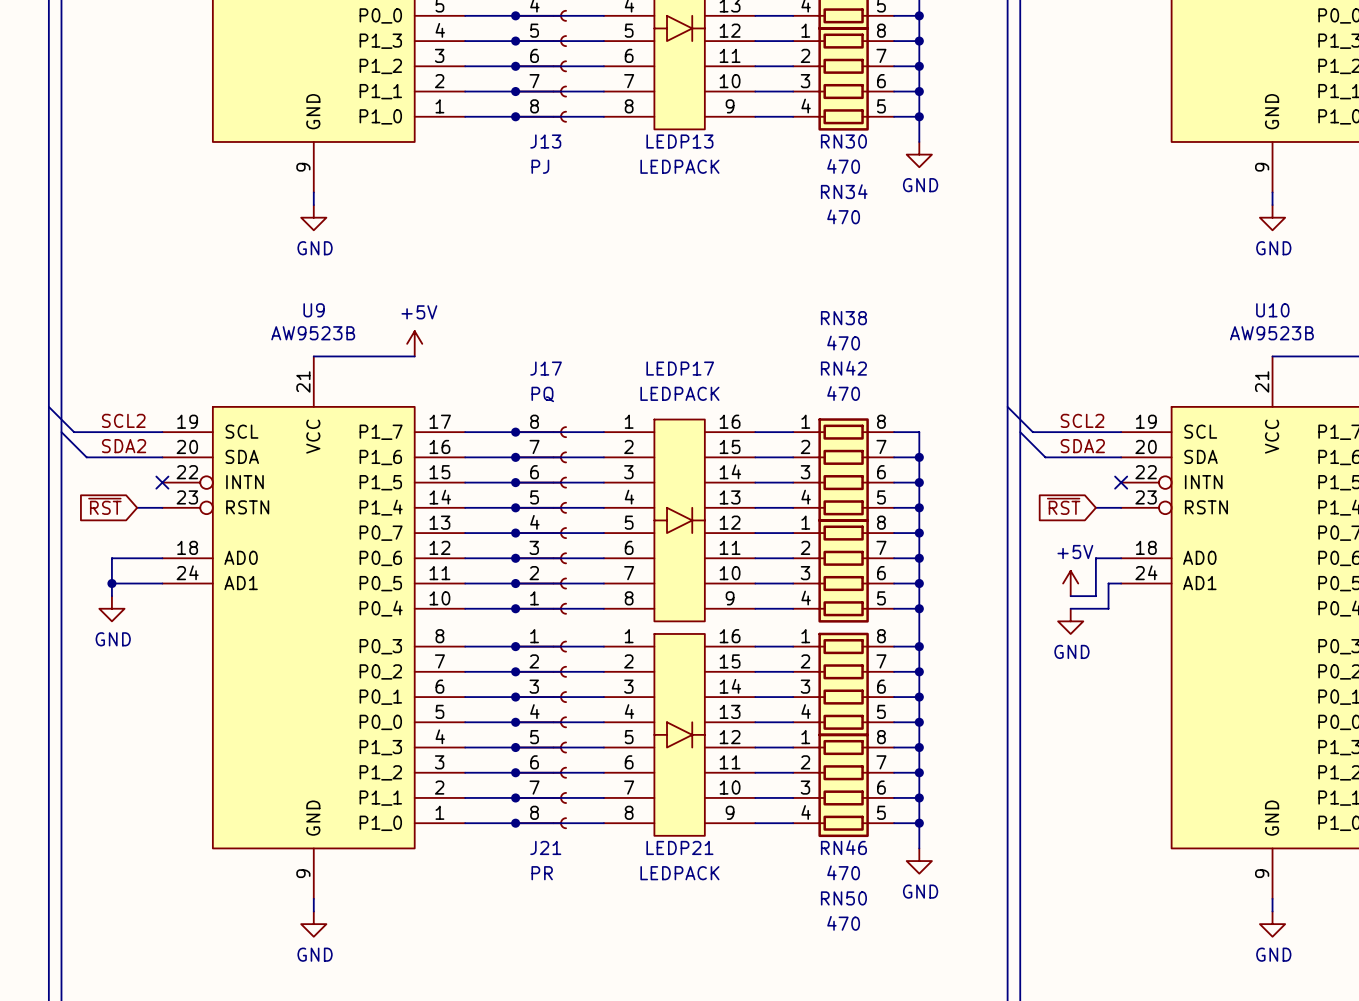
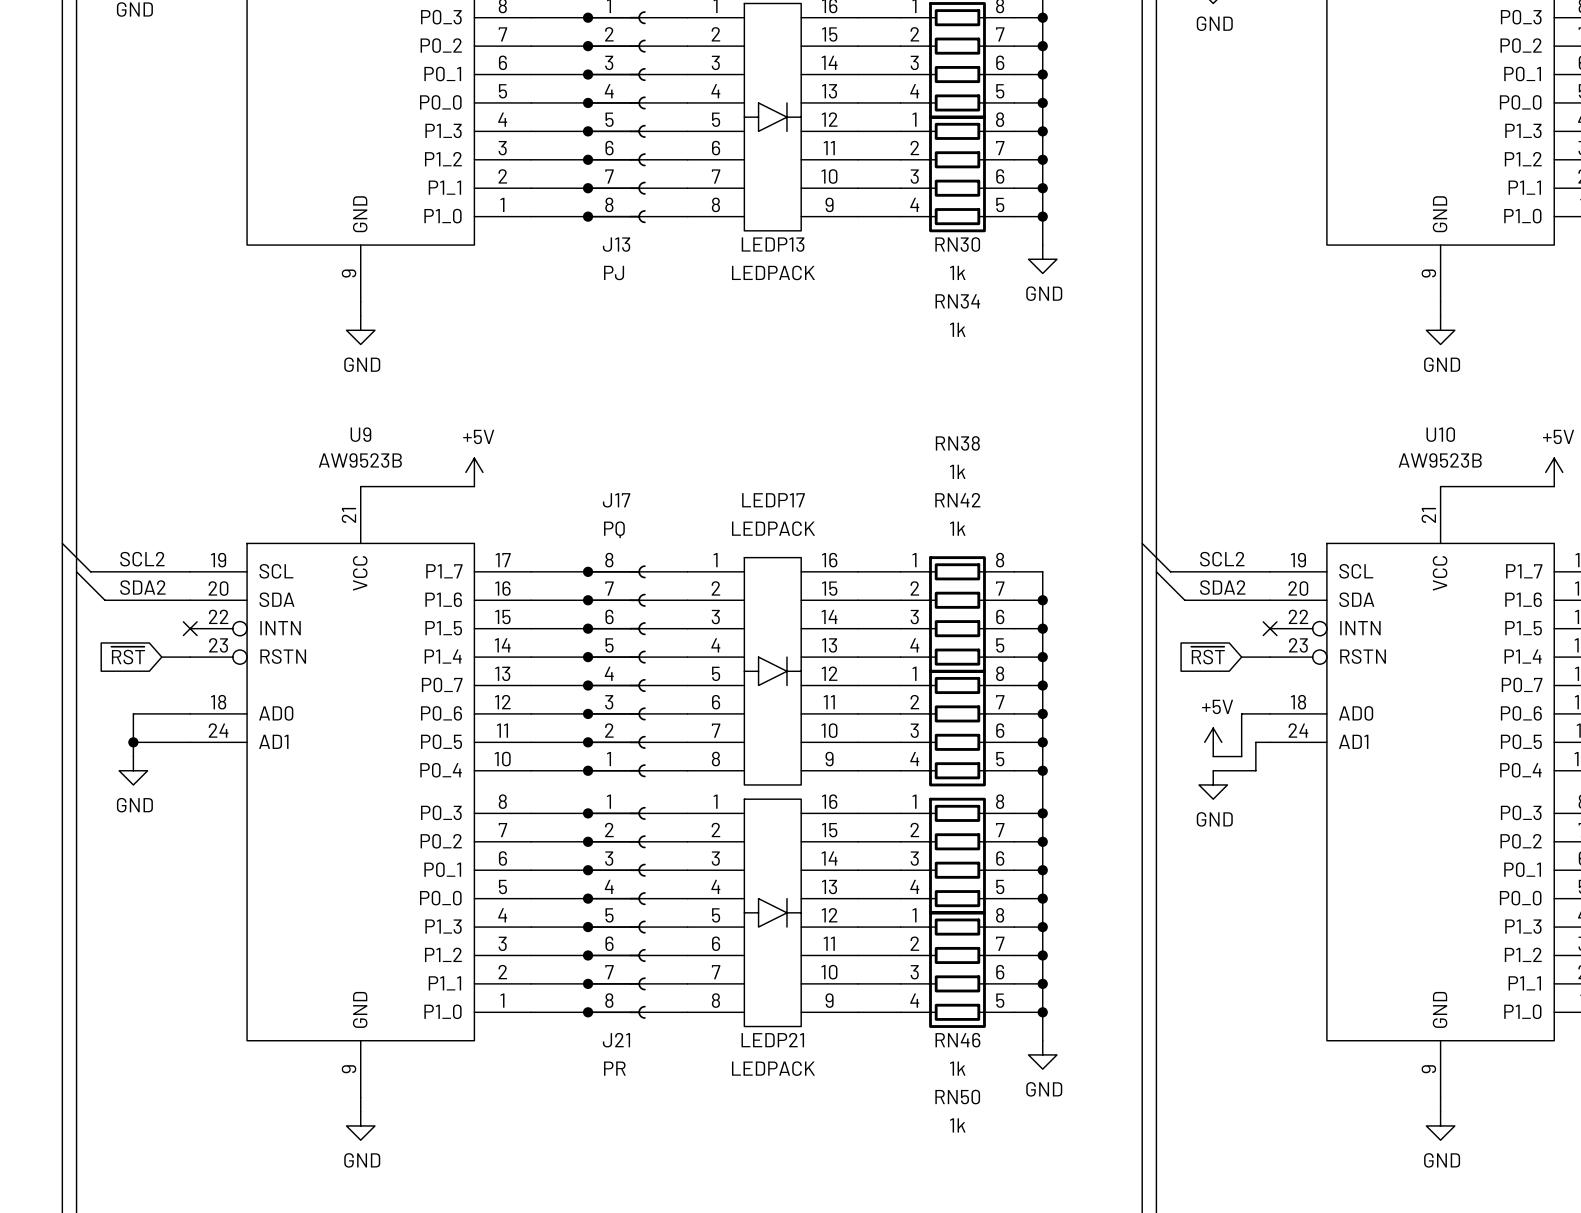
RN30 value: 470 (843, 166) -> 1k (957, 272)
RN34 value: 470 (843, 216) -> 1k (957, 329)
RN38 value: 470 (843, 343) -> 1k (957, 471)
RN42 value: 470 (843, 393) -> 1k (957, 528)
RN46 value: 470 (843, 872) -> 1k (957, 1068)
RN50 value: 470 (843, 923) -> 1k (957, 1125)

